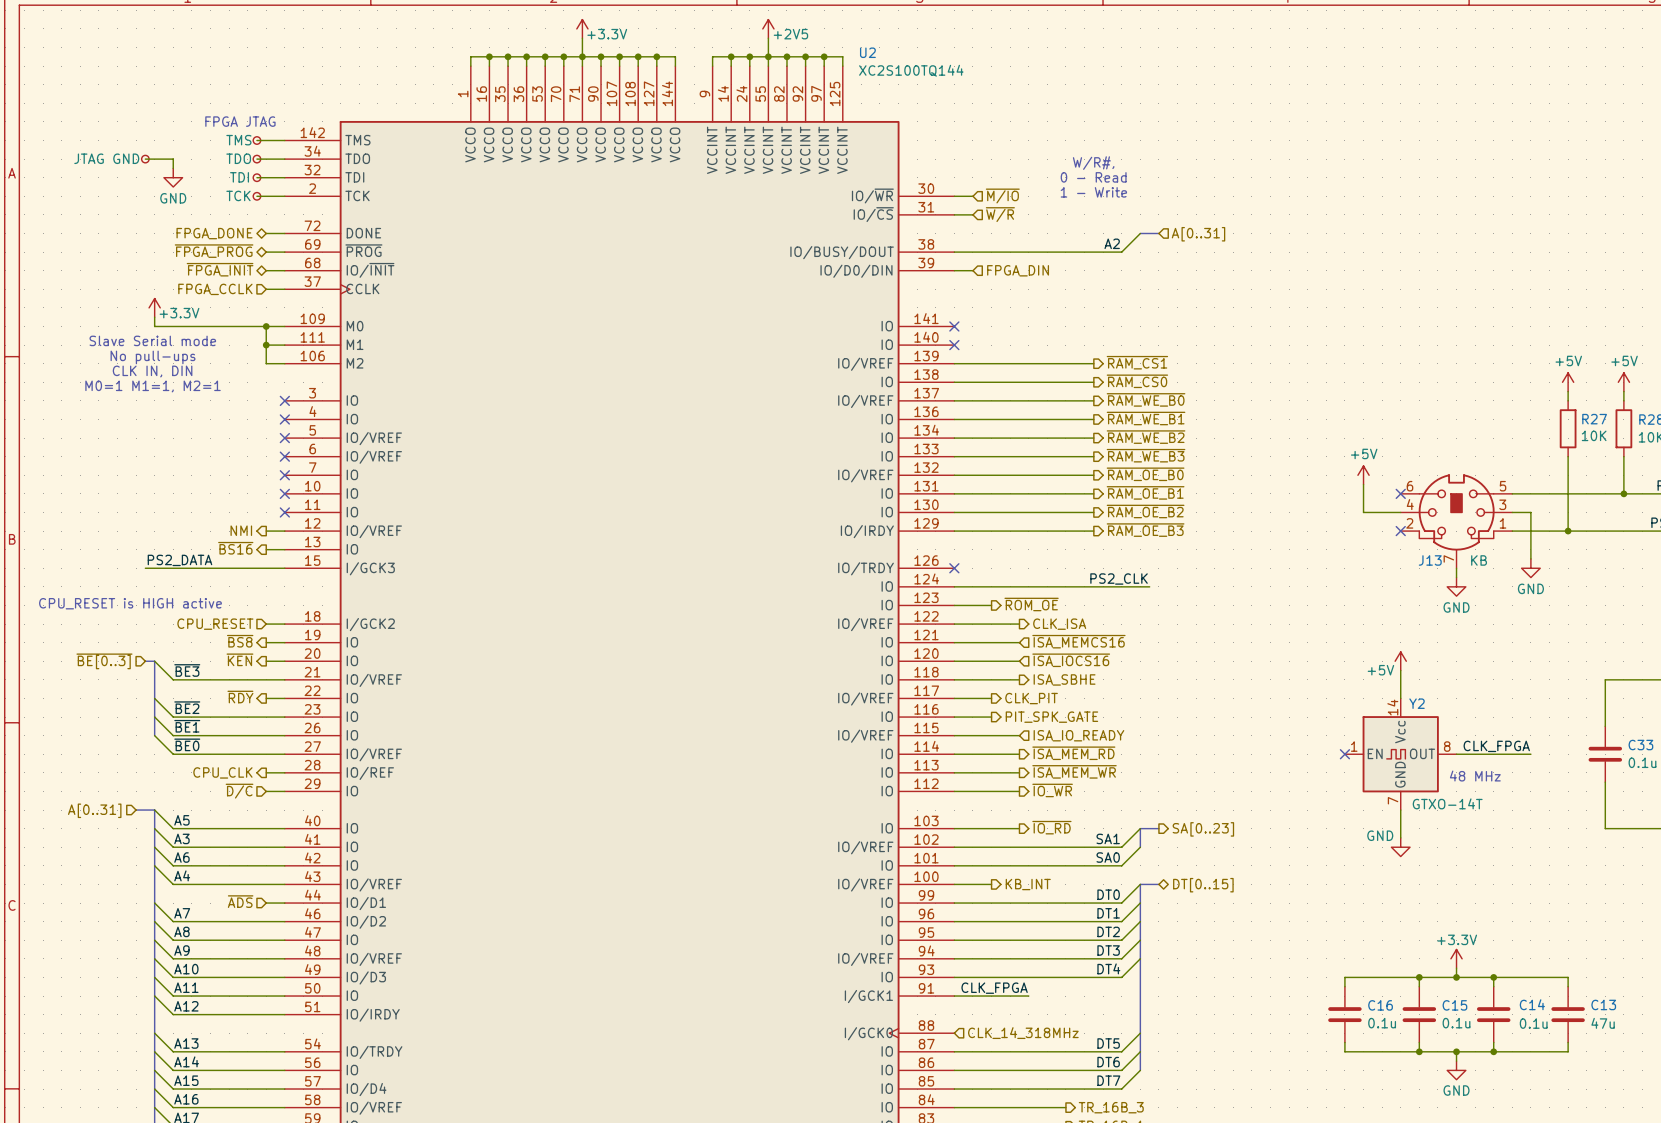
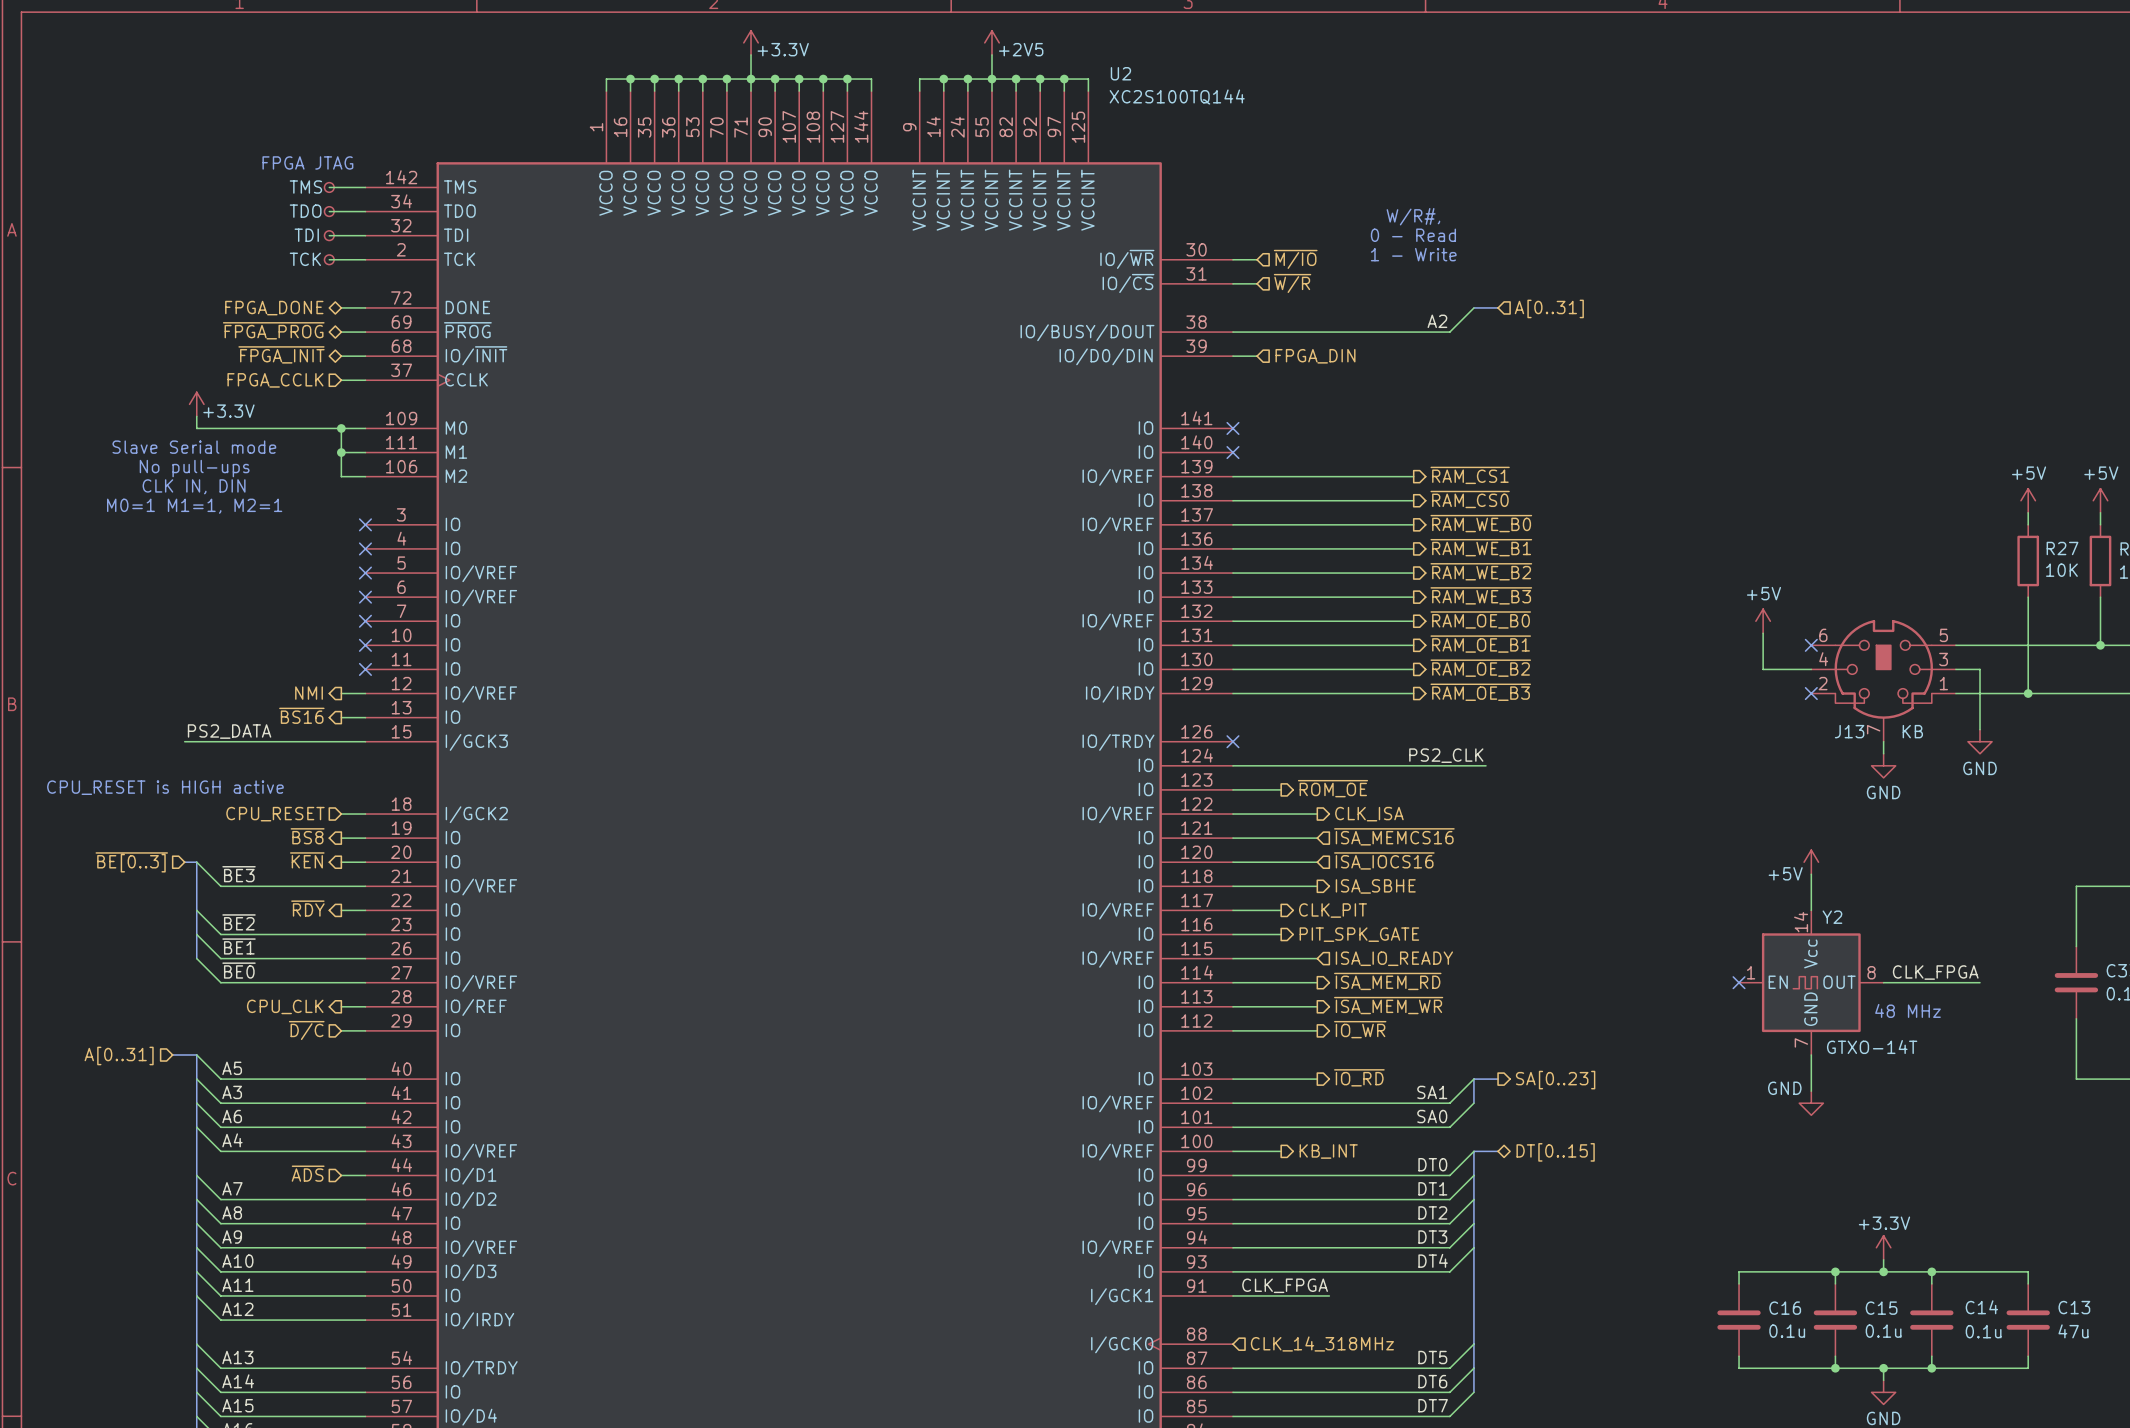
wire: (145, 159) (173, 159) (173, 168) -> none
part: JTAG GND (145, 159) -> none
power symbol: GND (173, 177) -> none

